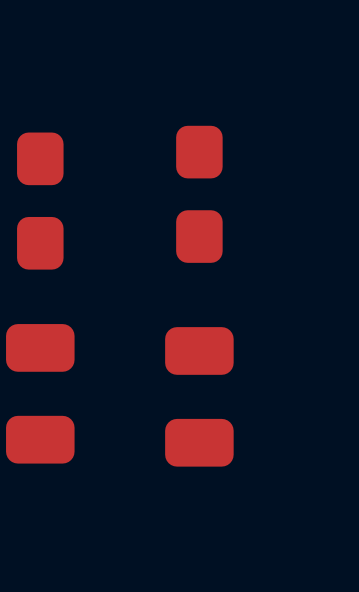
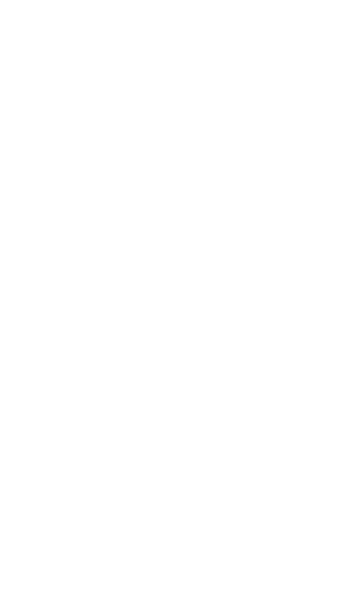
part: (199, 194) -> none
part: (40, 201) -> none
part: (40, 393) -> none
part: (199, 396) -> none

